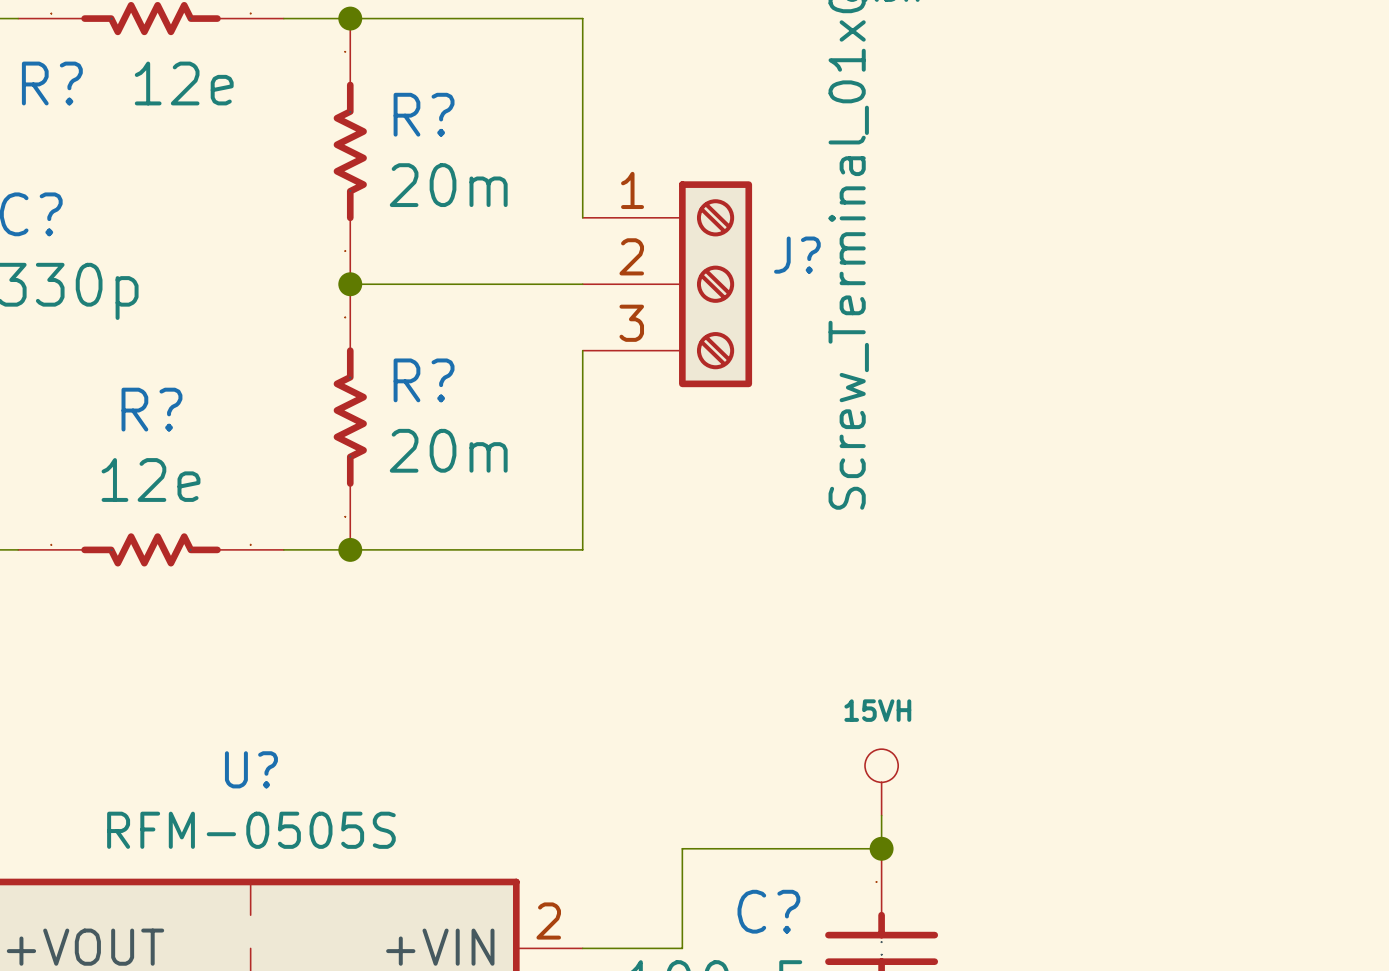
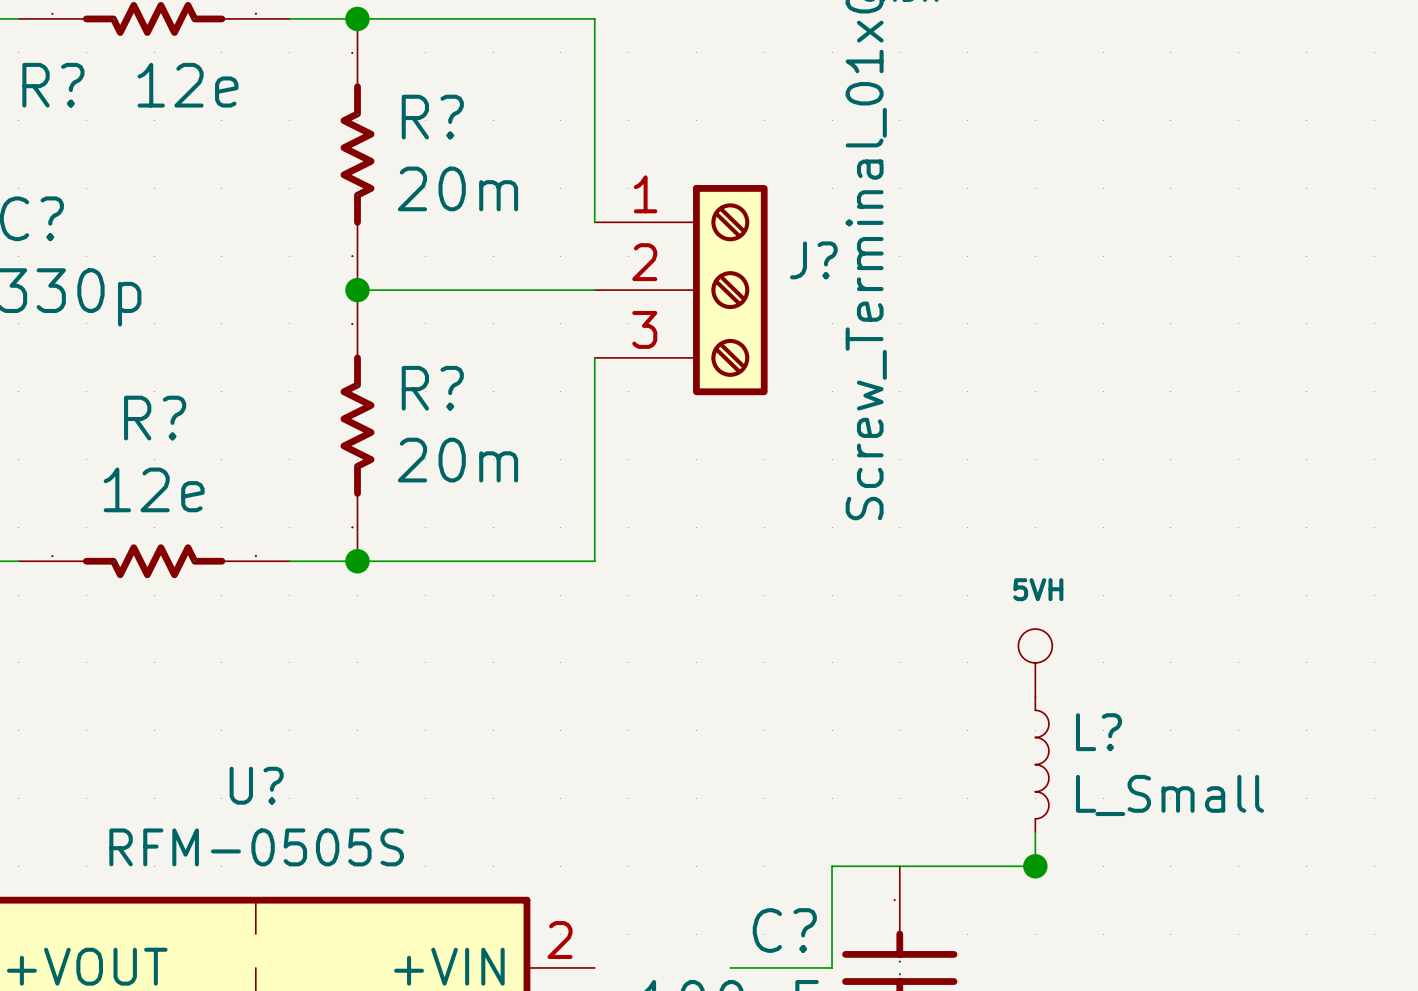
power symbol: none -> 5VH (1035, 662)
L?: none -> L_Small (1042, 764)
power symbol: 15VH (881, 782) -> none
wire: (881, 815) (881, 848) -> (1035, 832) (1035, 866) (899, 866)
wire: (815, 848) (682, 848) (682, 948) (582, 948) -> (832, 866) (832, 967) (730, 967)
junction: (881, 848) -> none
junction: none -> (1035, 866)

